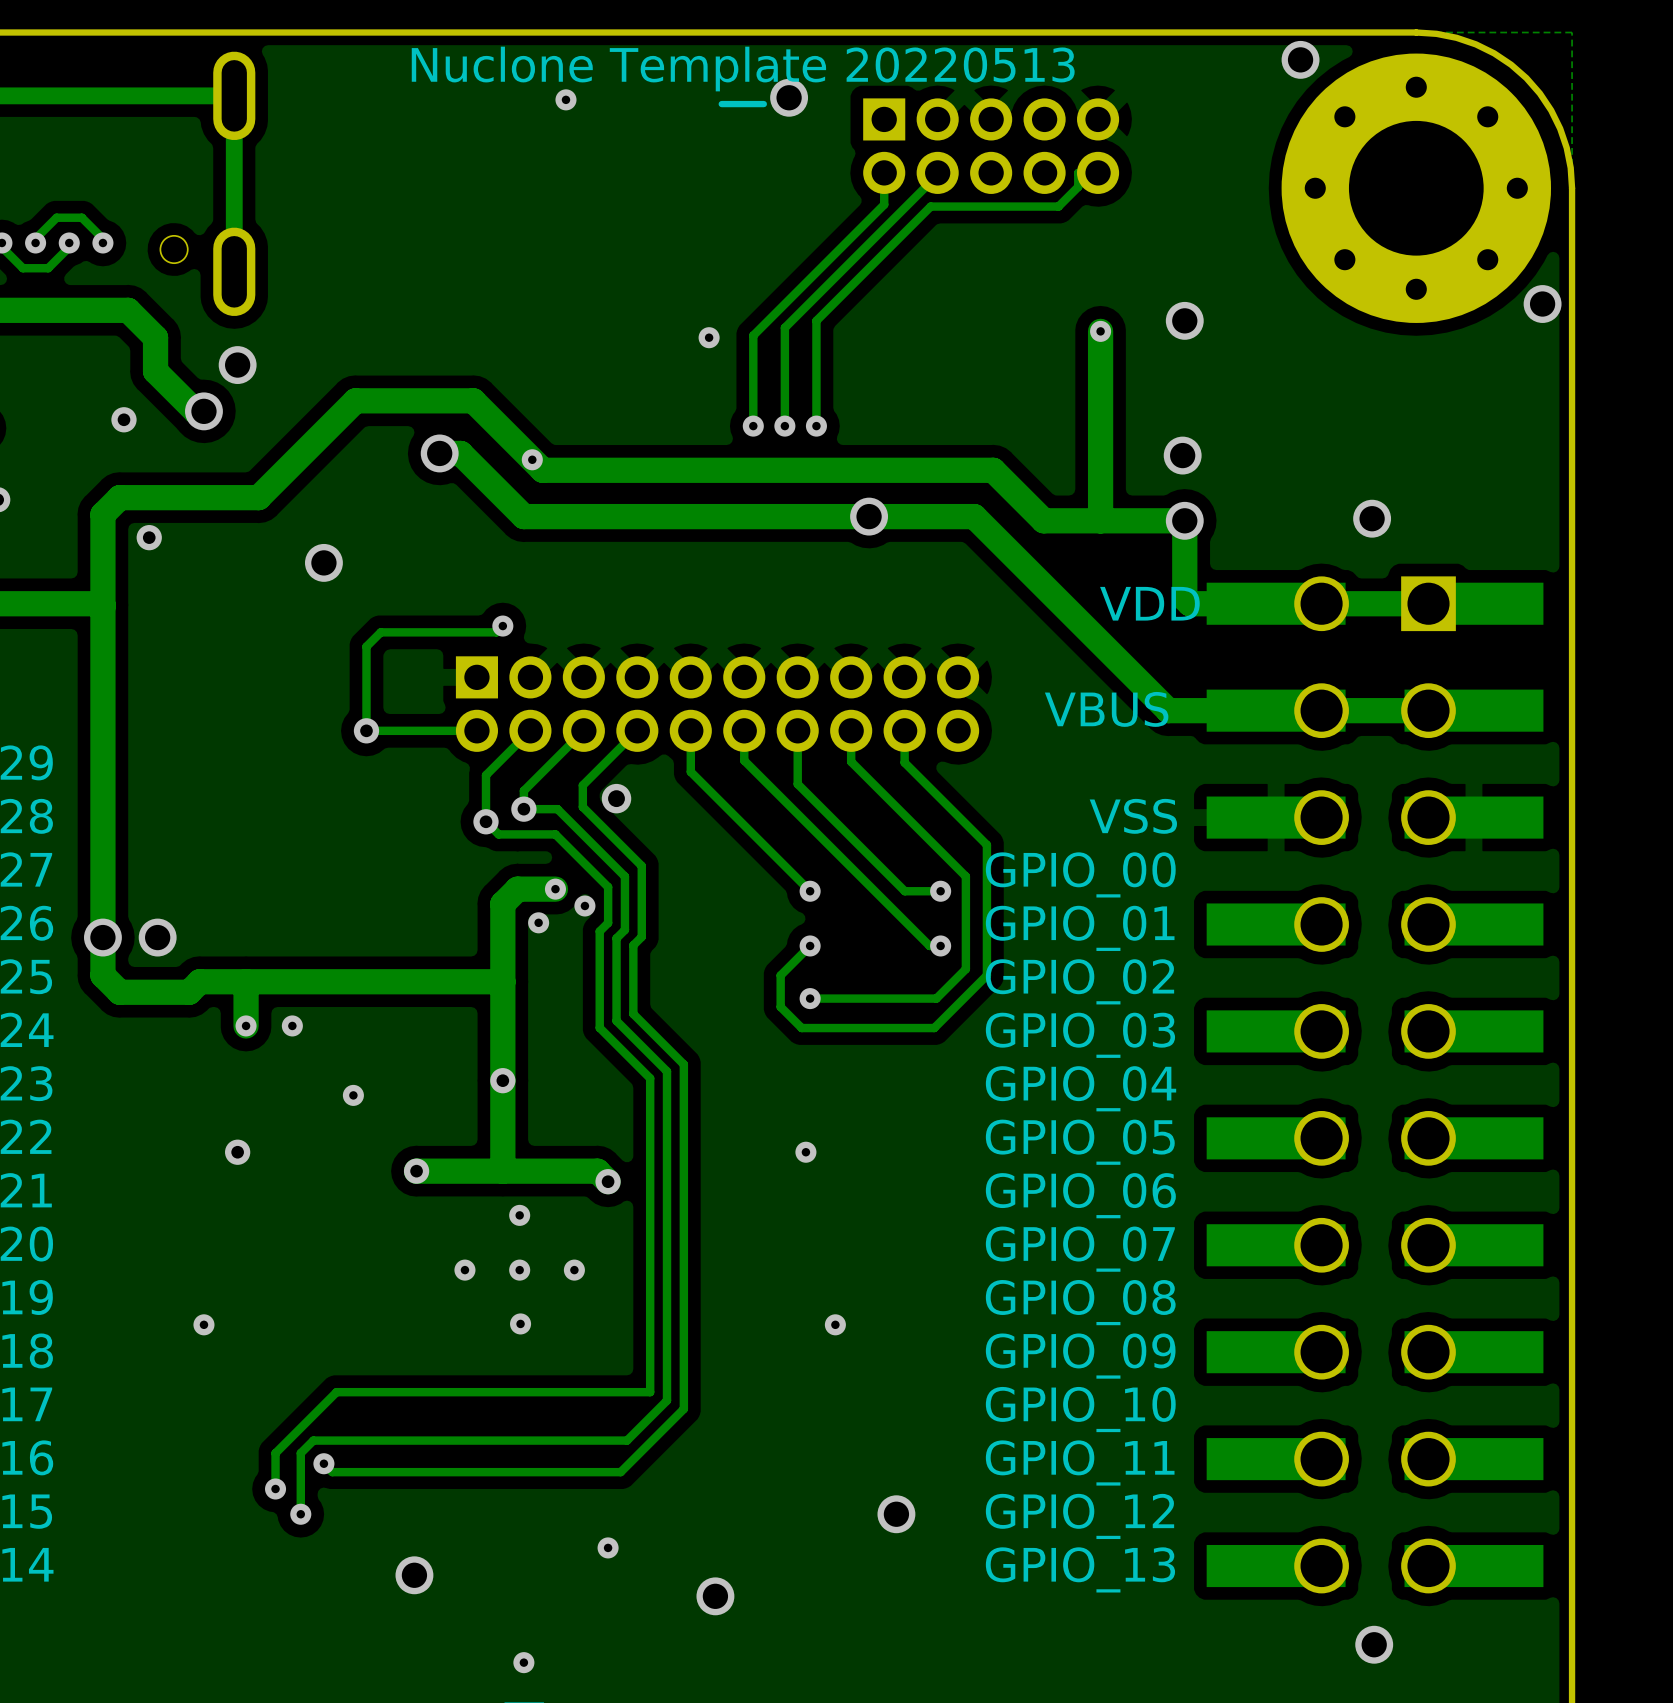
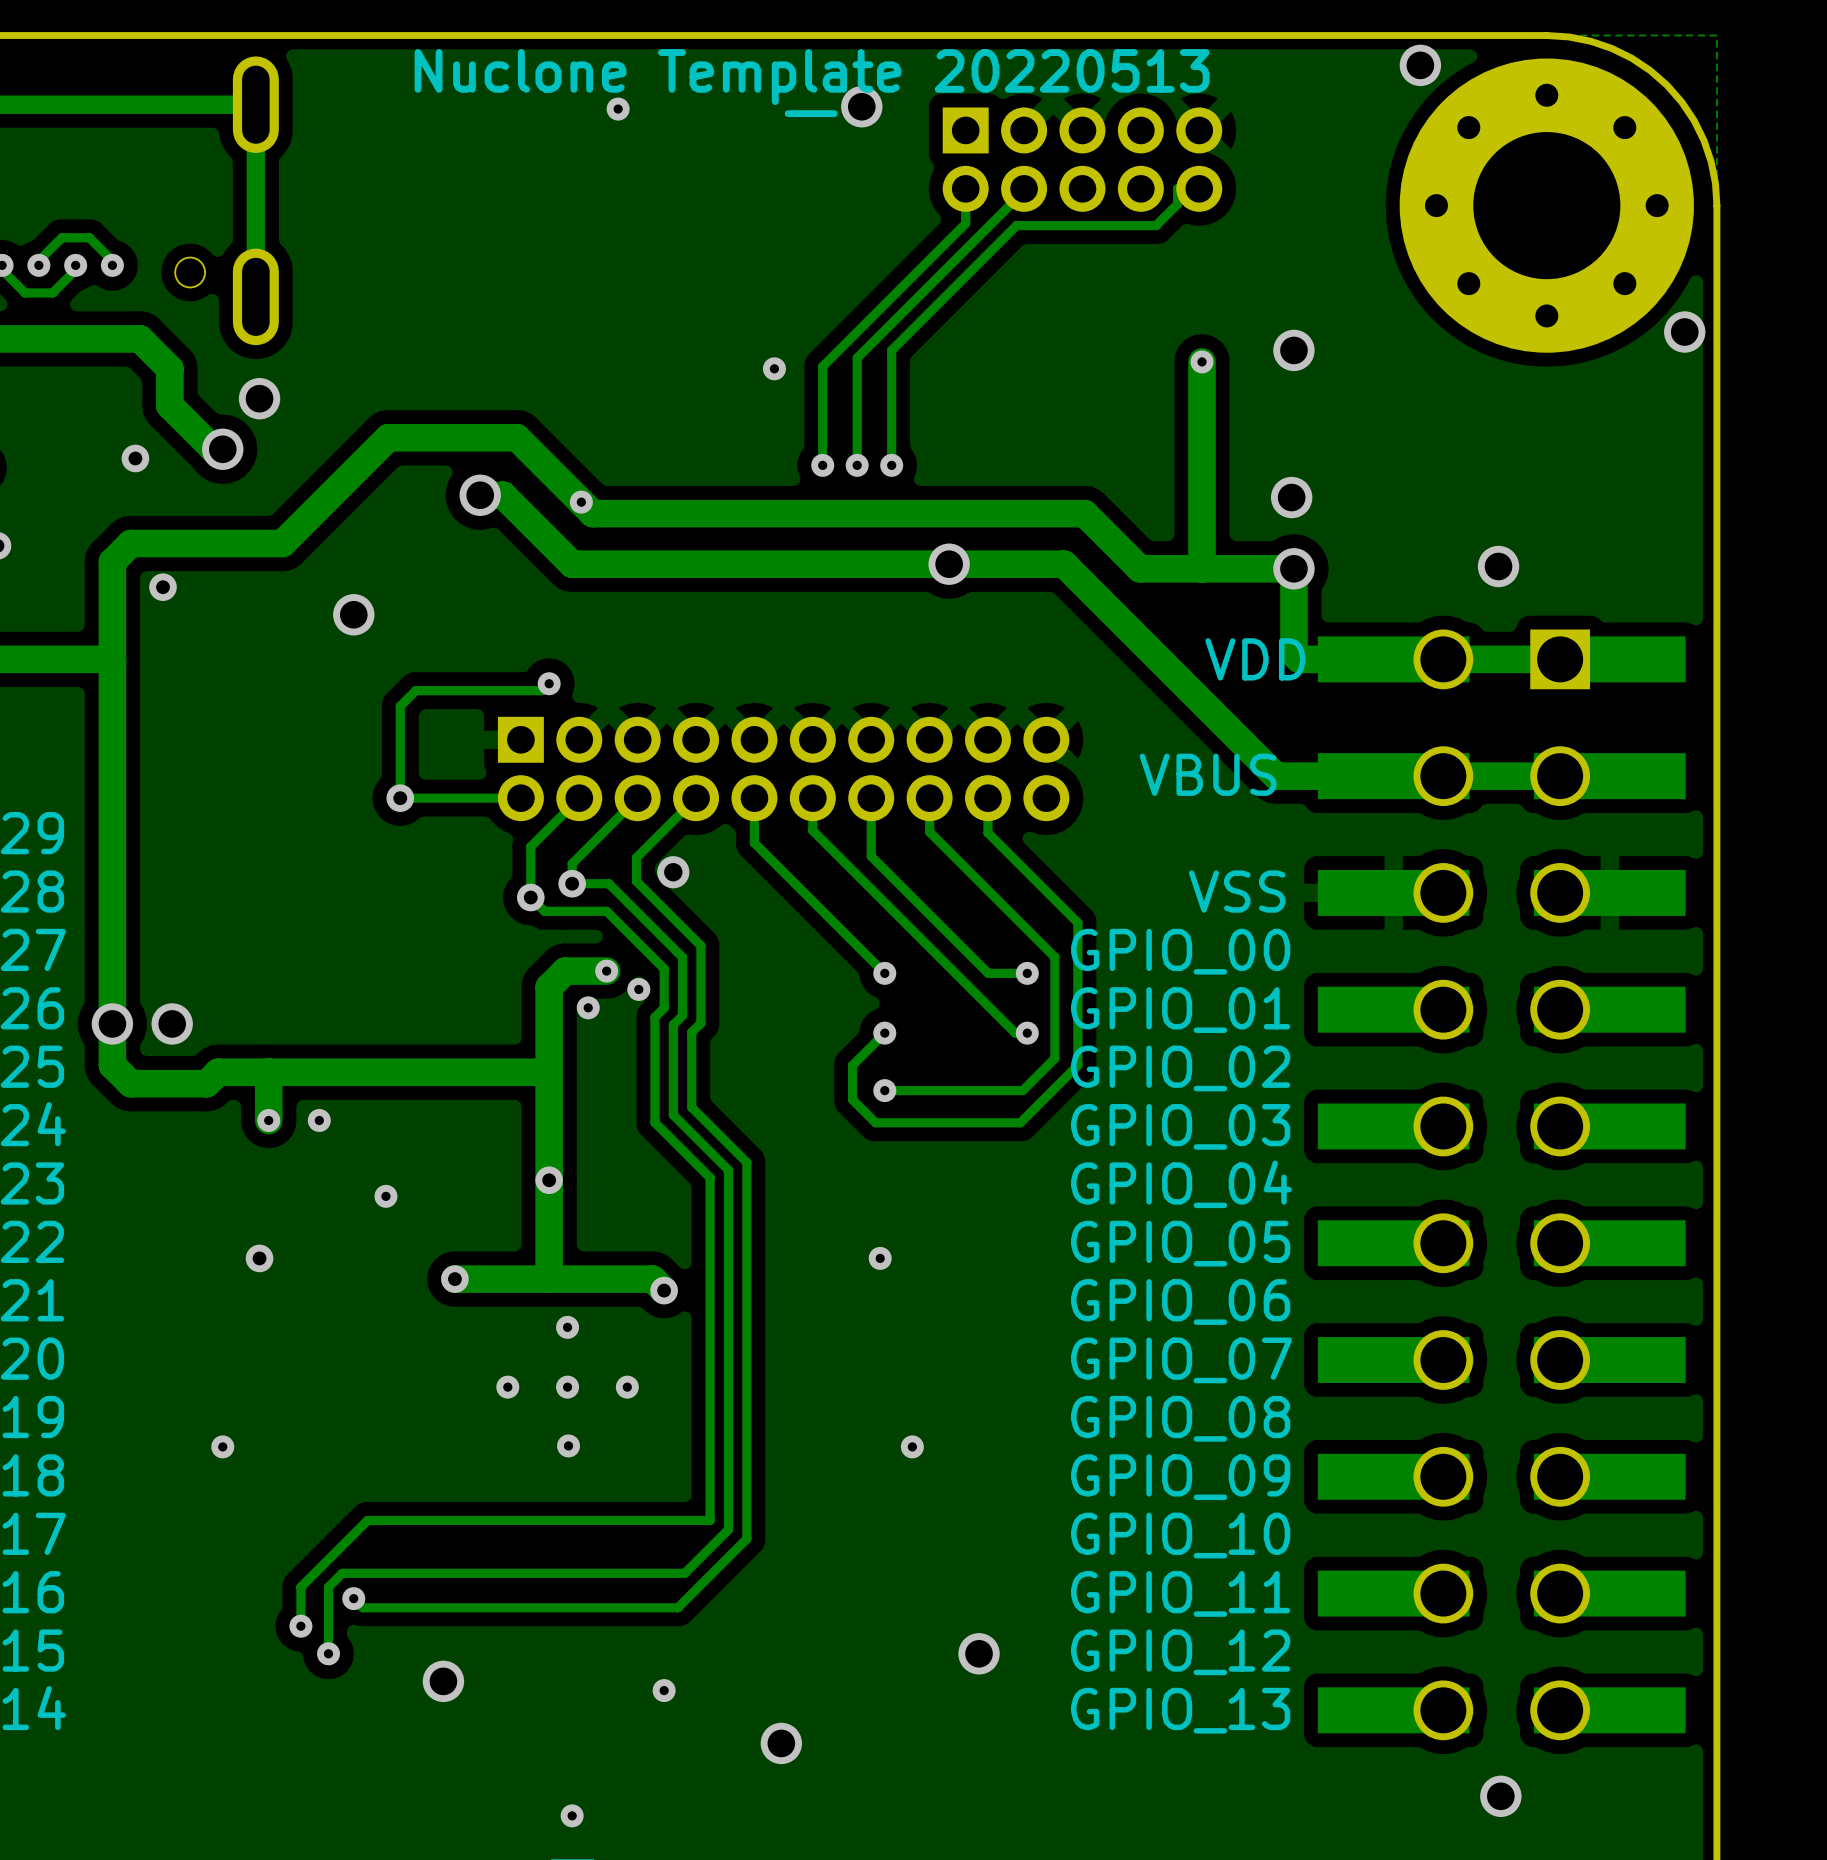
via position: (414, 1575) -> (443, 1681)

